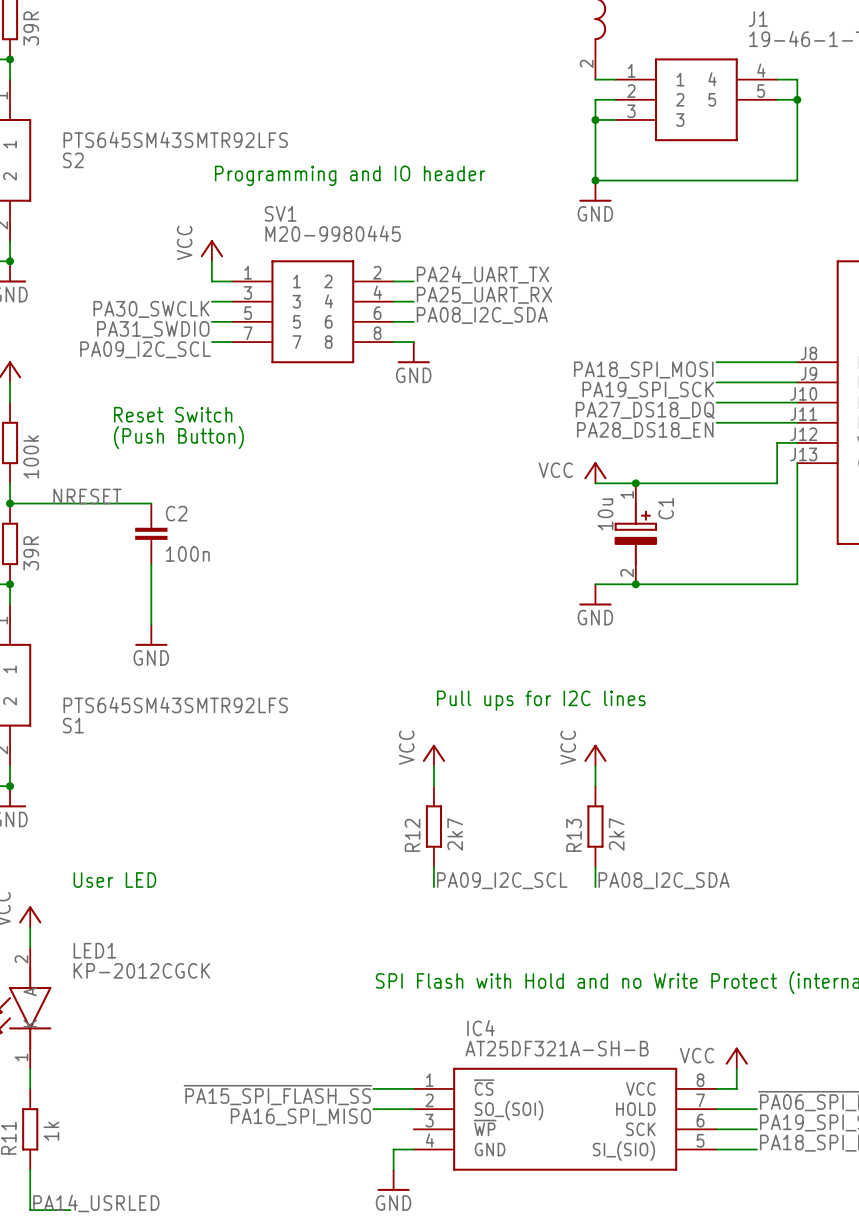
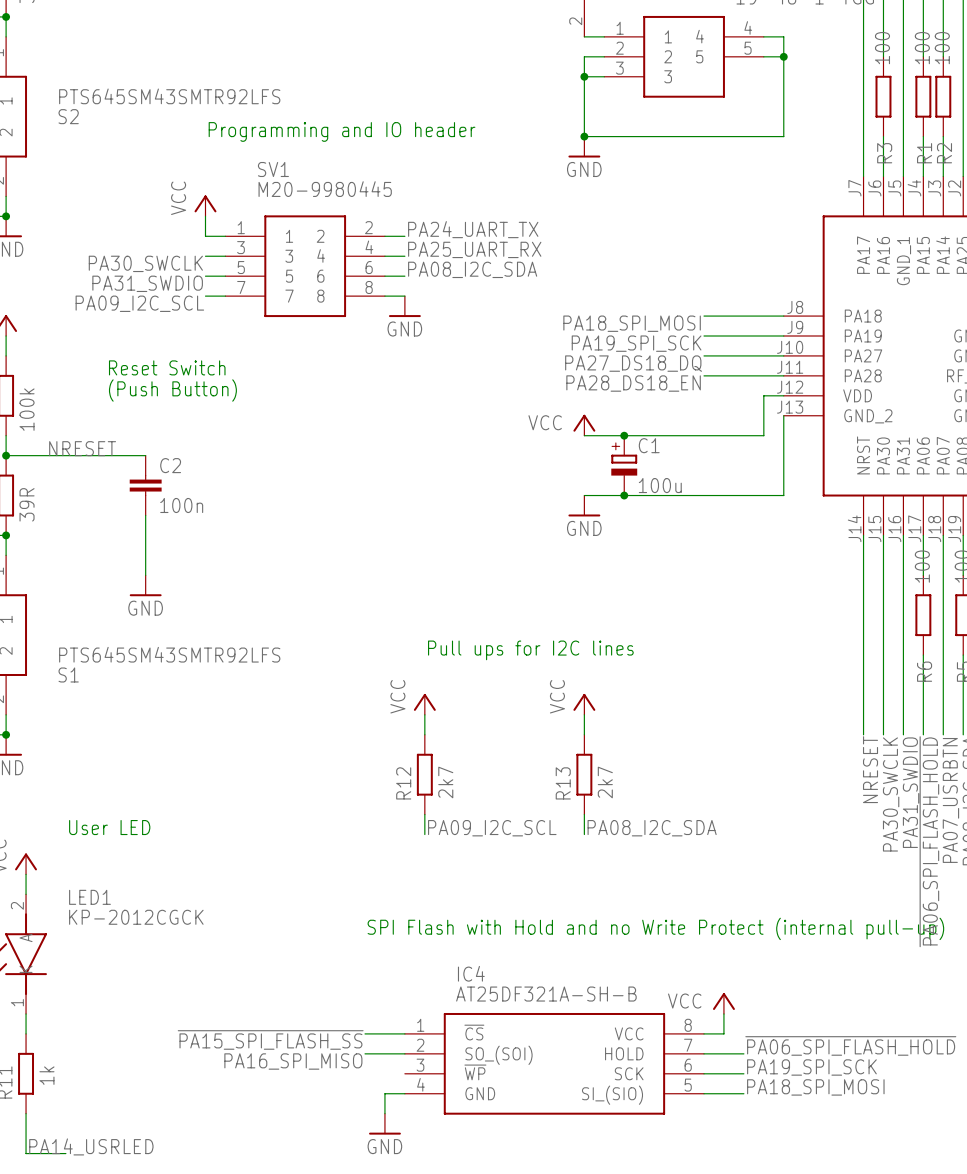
C1 symbol: [614, 483, 658, 585] -> [611, 435, 638, 496]
C1 value: 10u (605, 514) -> 100u (660, 485)
wire: (797, 543) (797, 584) (595, 584) -> (783, 495) (584, 495)
junction position: (635, 584) -> (624, 495)
power symbol position: GND (595, 594) -> GND (584, 505)

